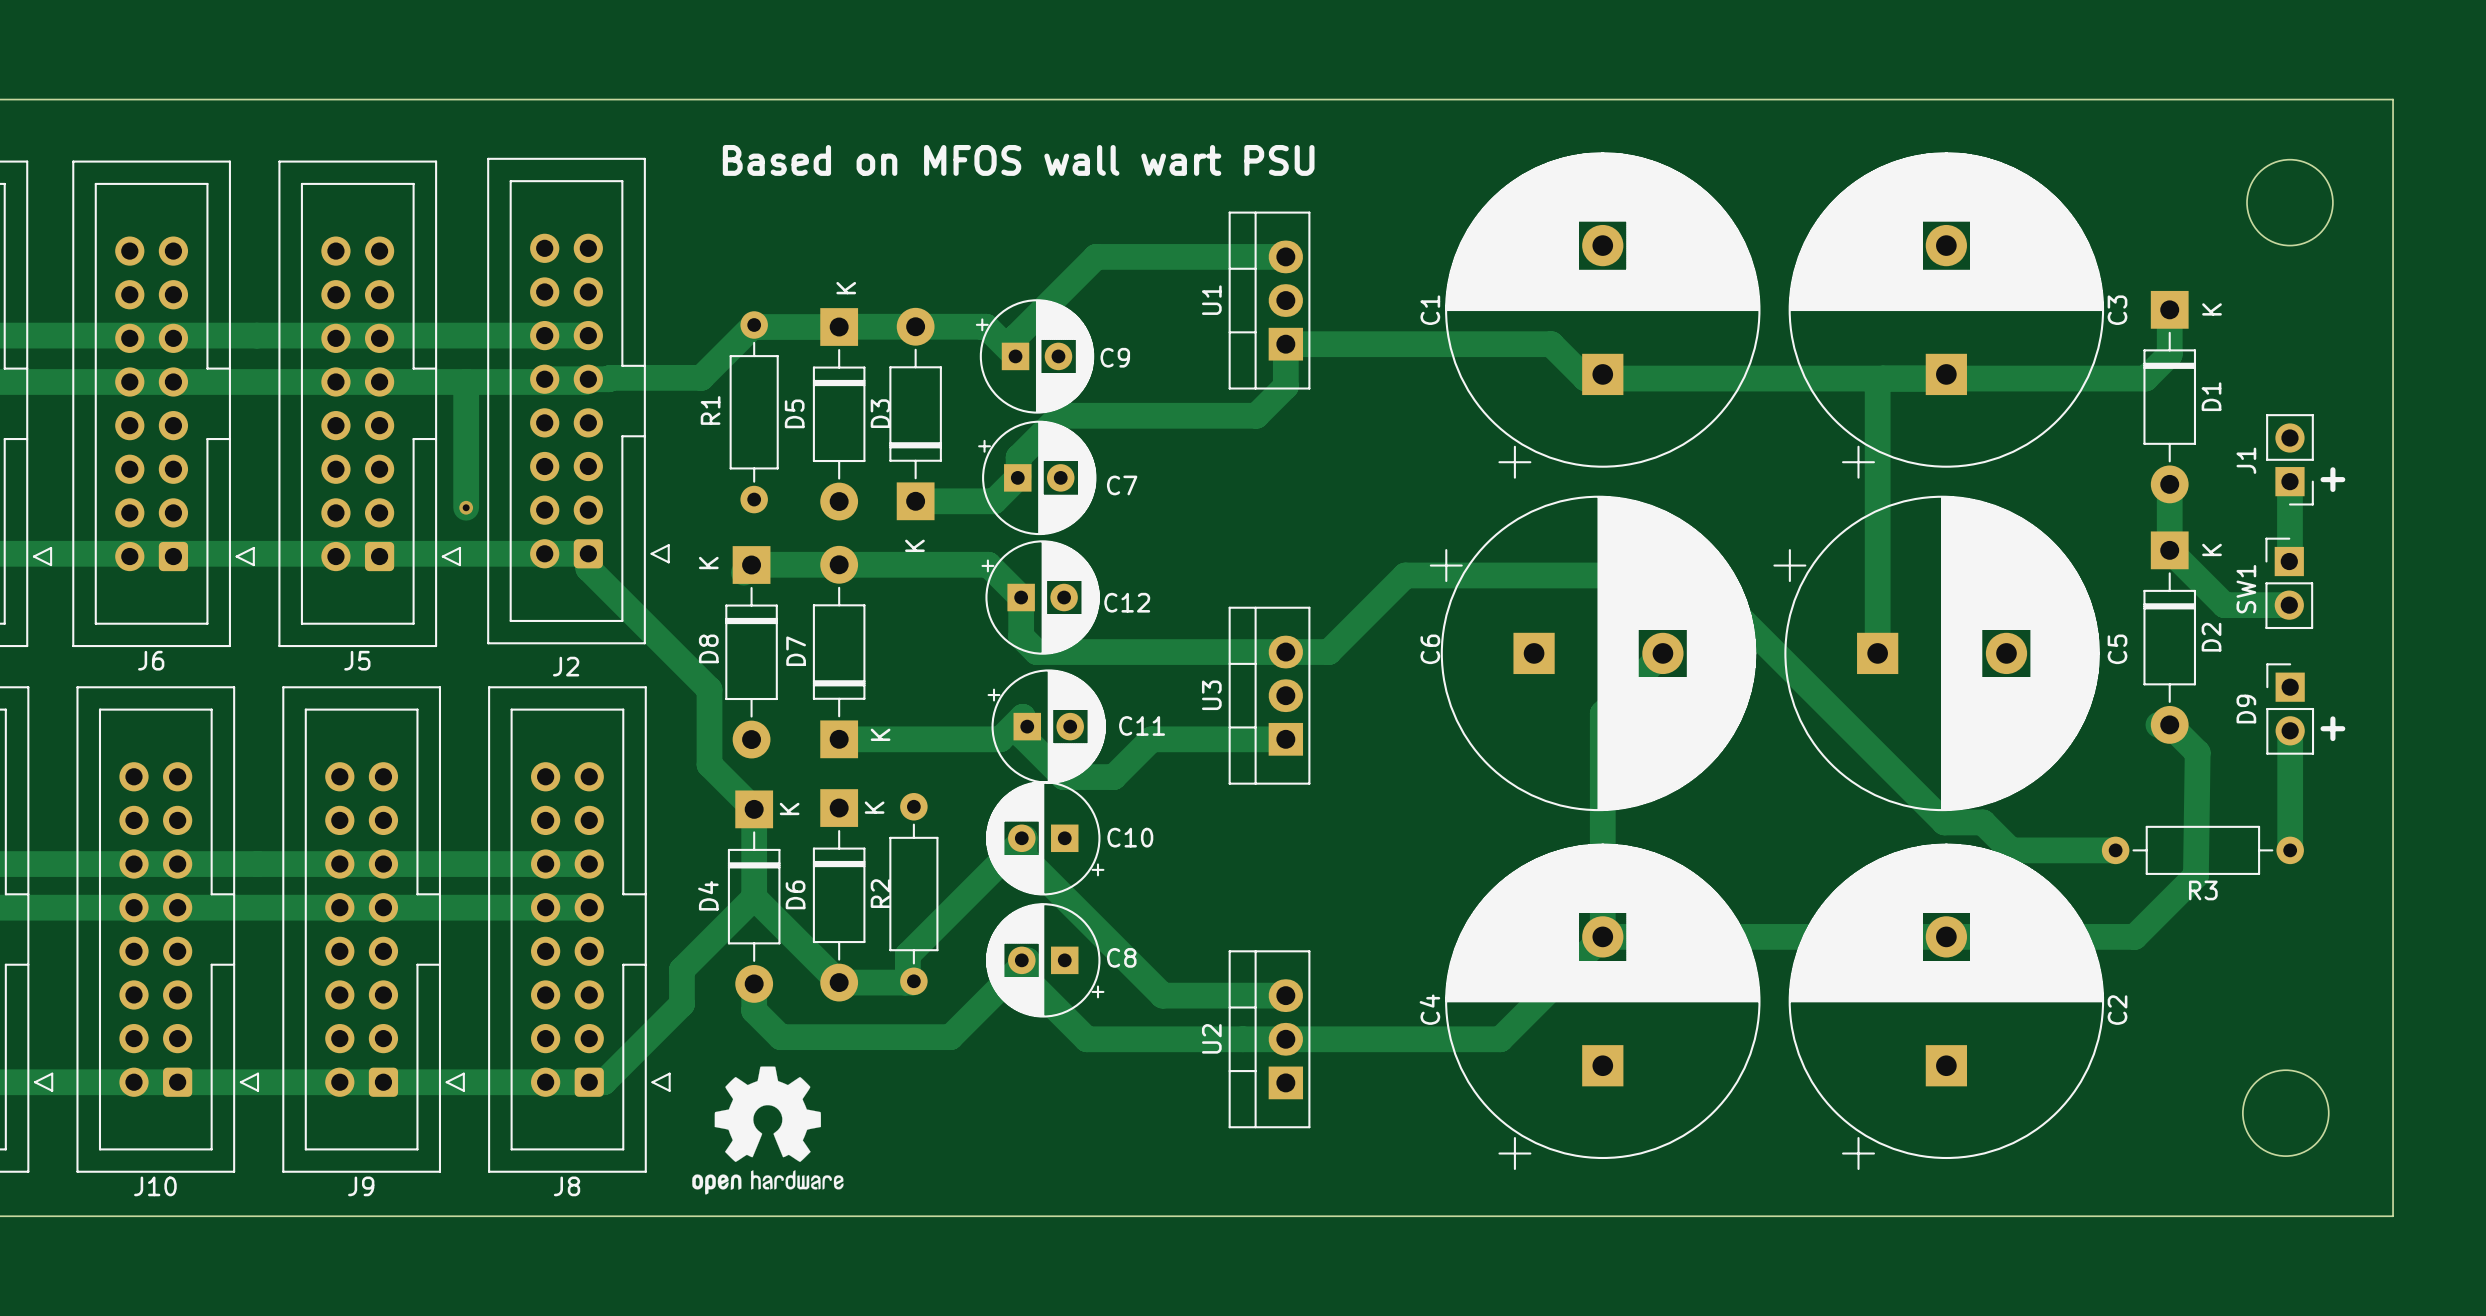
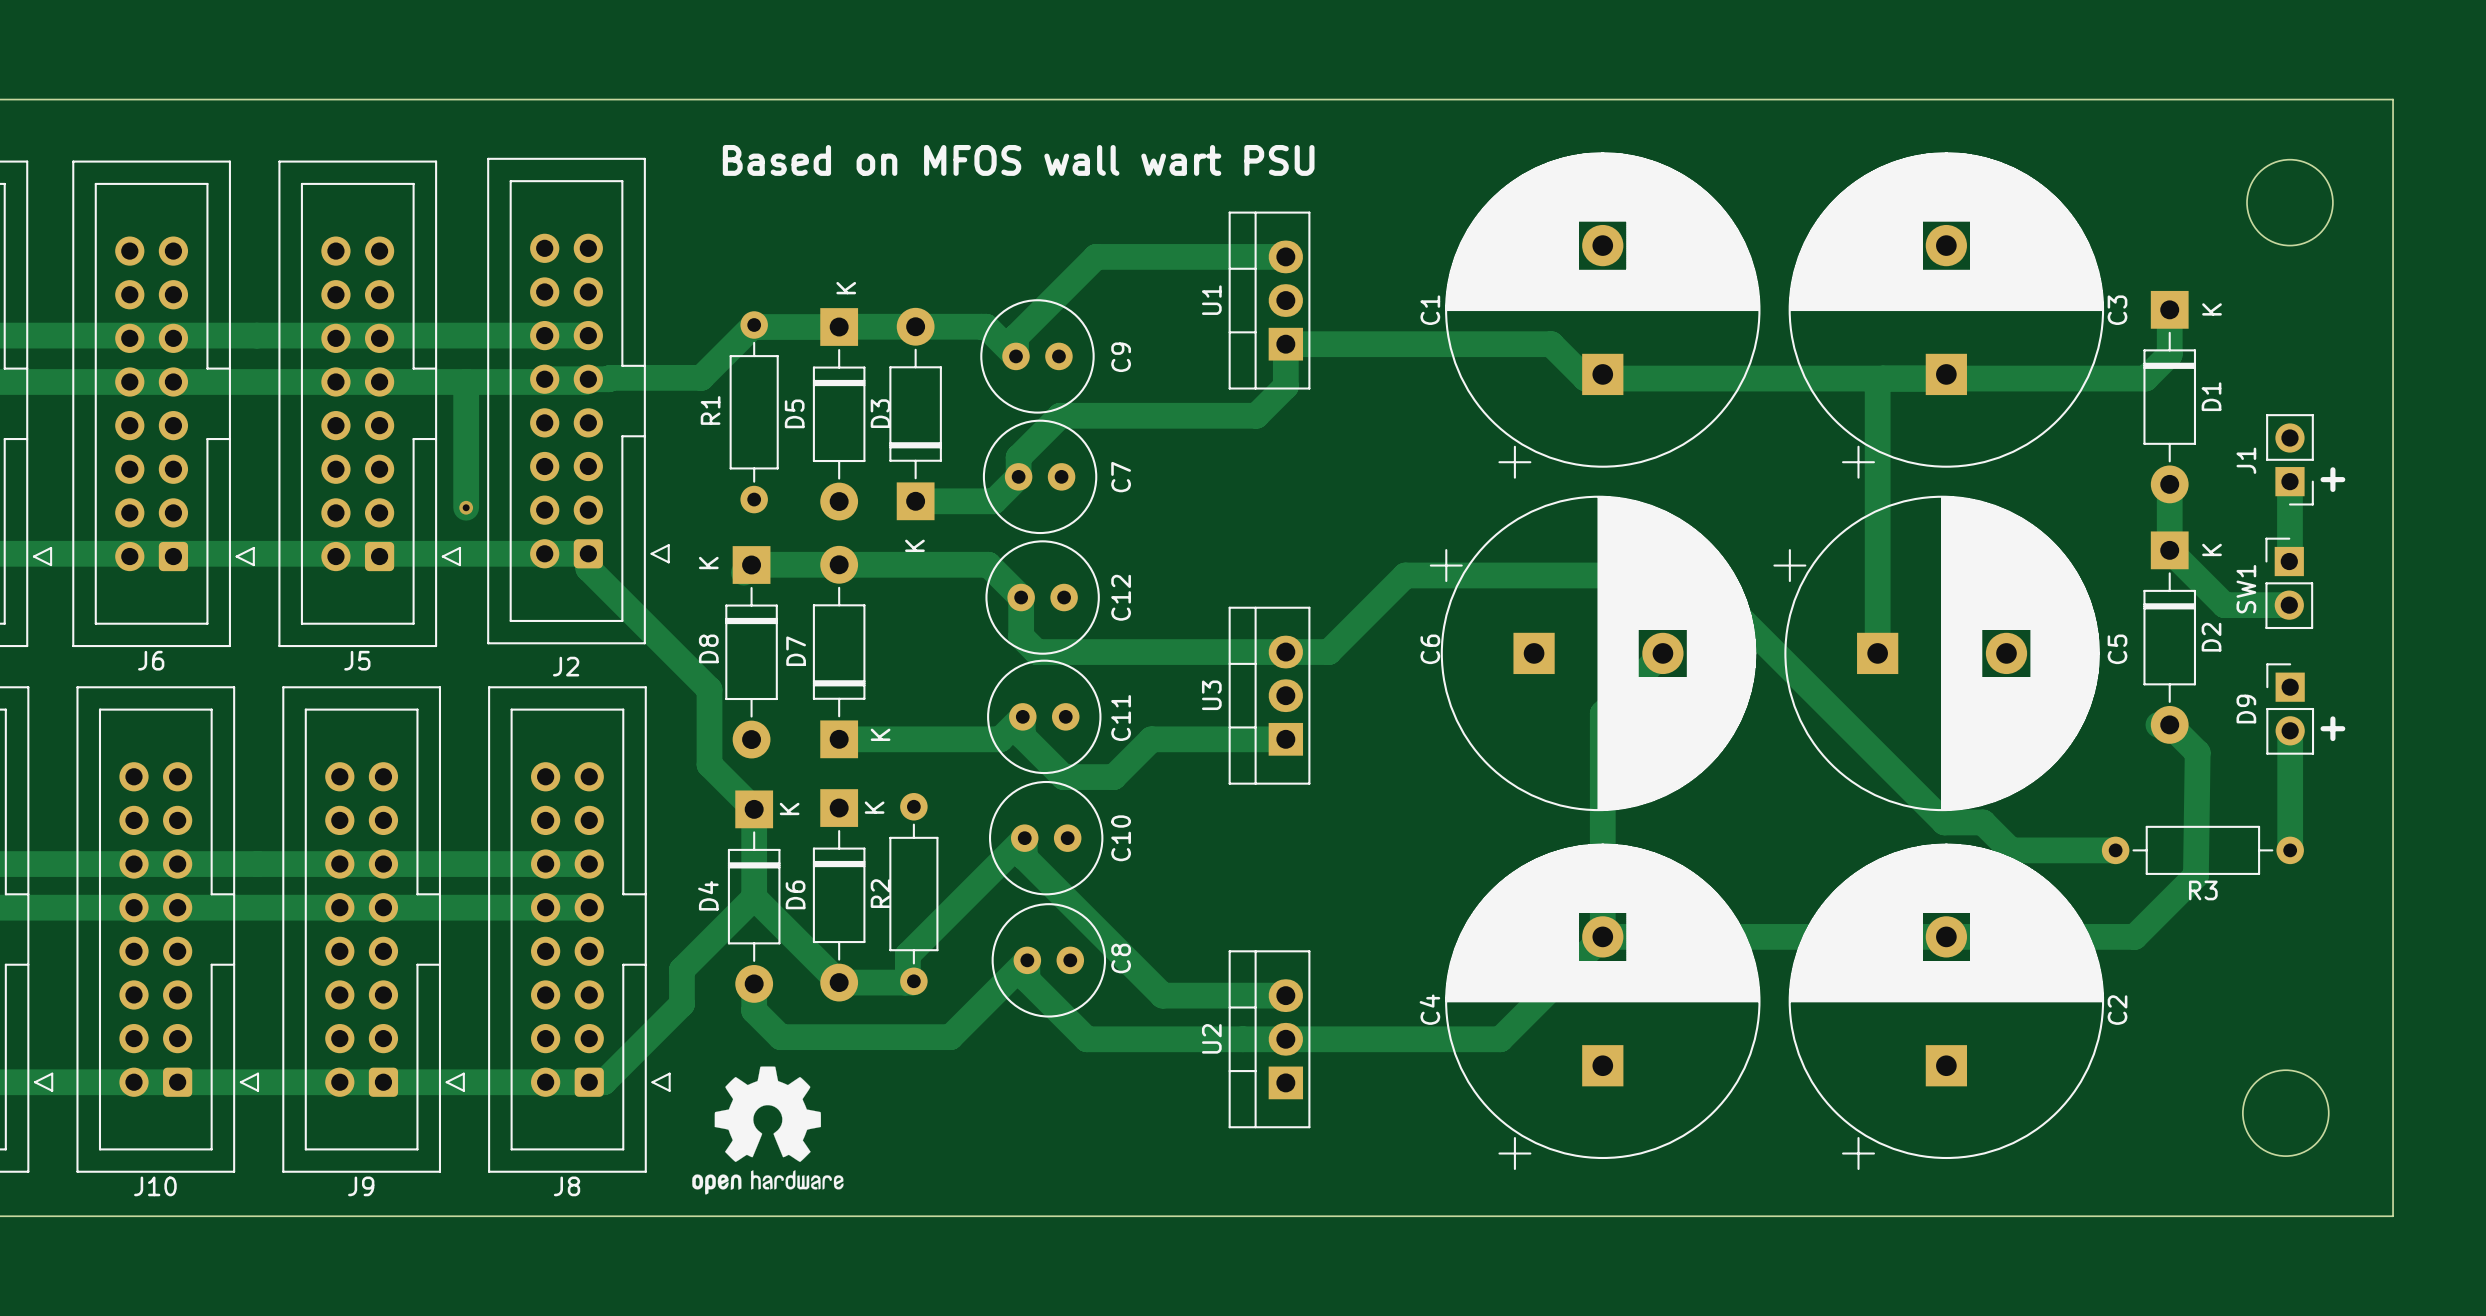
C9 footprint: [975, 299, 1095, 414] -> [980, 299, 1095, 414]
C7 footprint: [978, 420, 1097, 536] -> [982, 419, 1098, 535]
C12 footprint: [981, 540, 1100, 655] -> [985, 540, 1100, 655]
C11 footprint: [987, 669, 1106, 784] -> [987, 659, 1102, 775]
C10 footprint: [986, 781, 1105, 896] -> [988, 780, 1104, 896]
C8 footprint: [986, 903, 1105, 1018] -> [991, 903, 1107, 1018]

